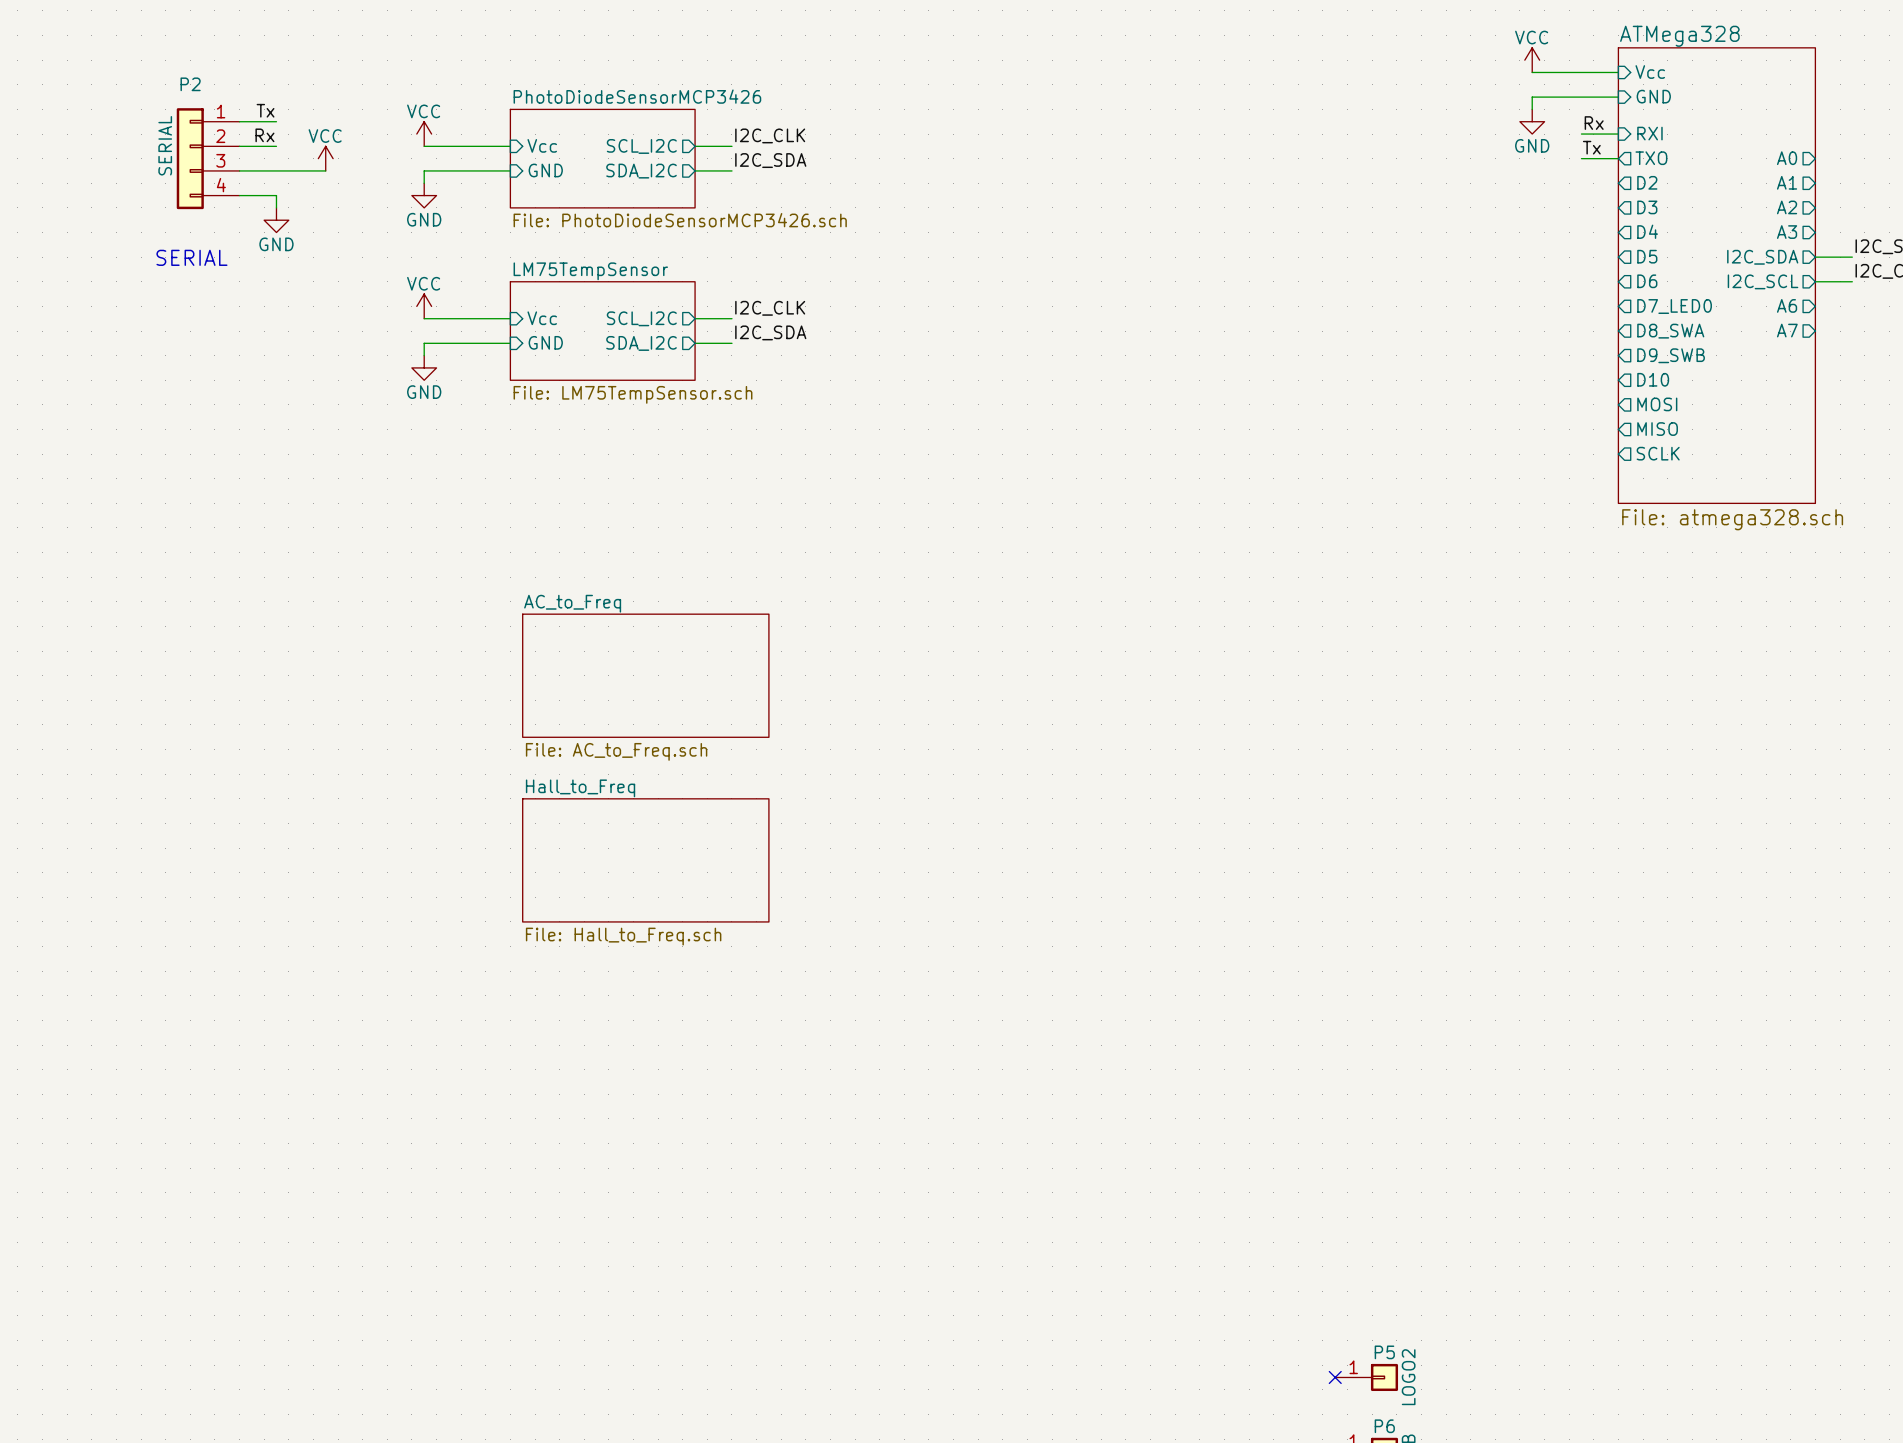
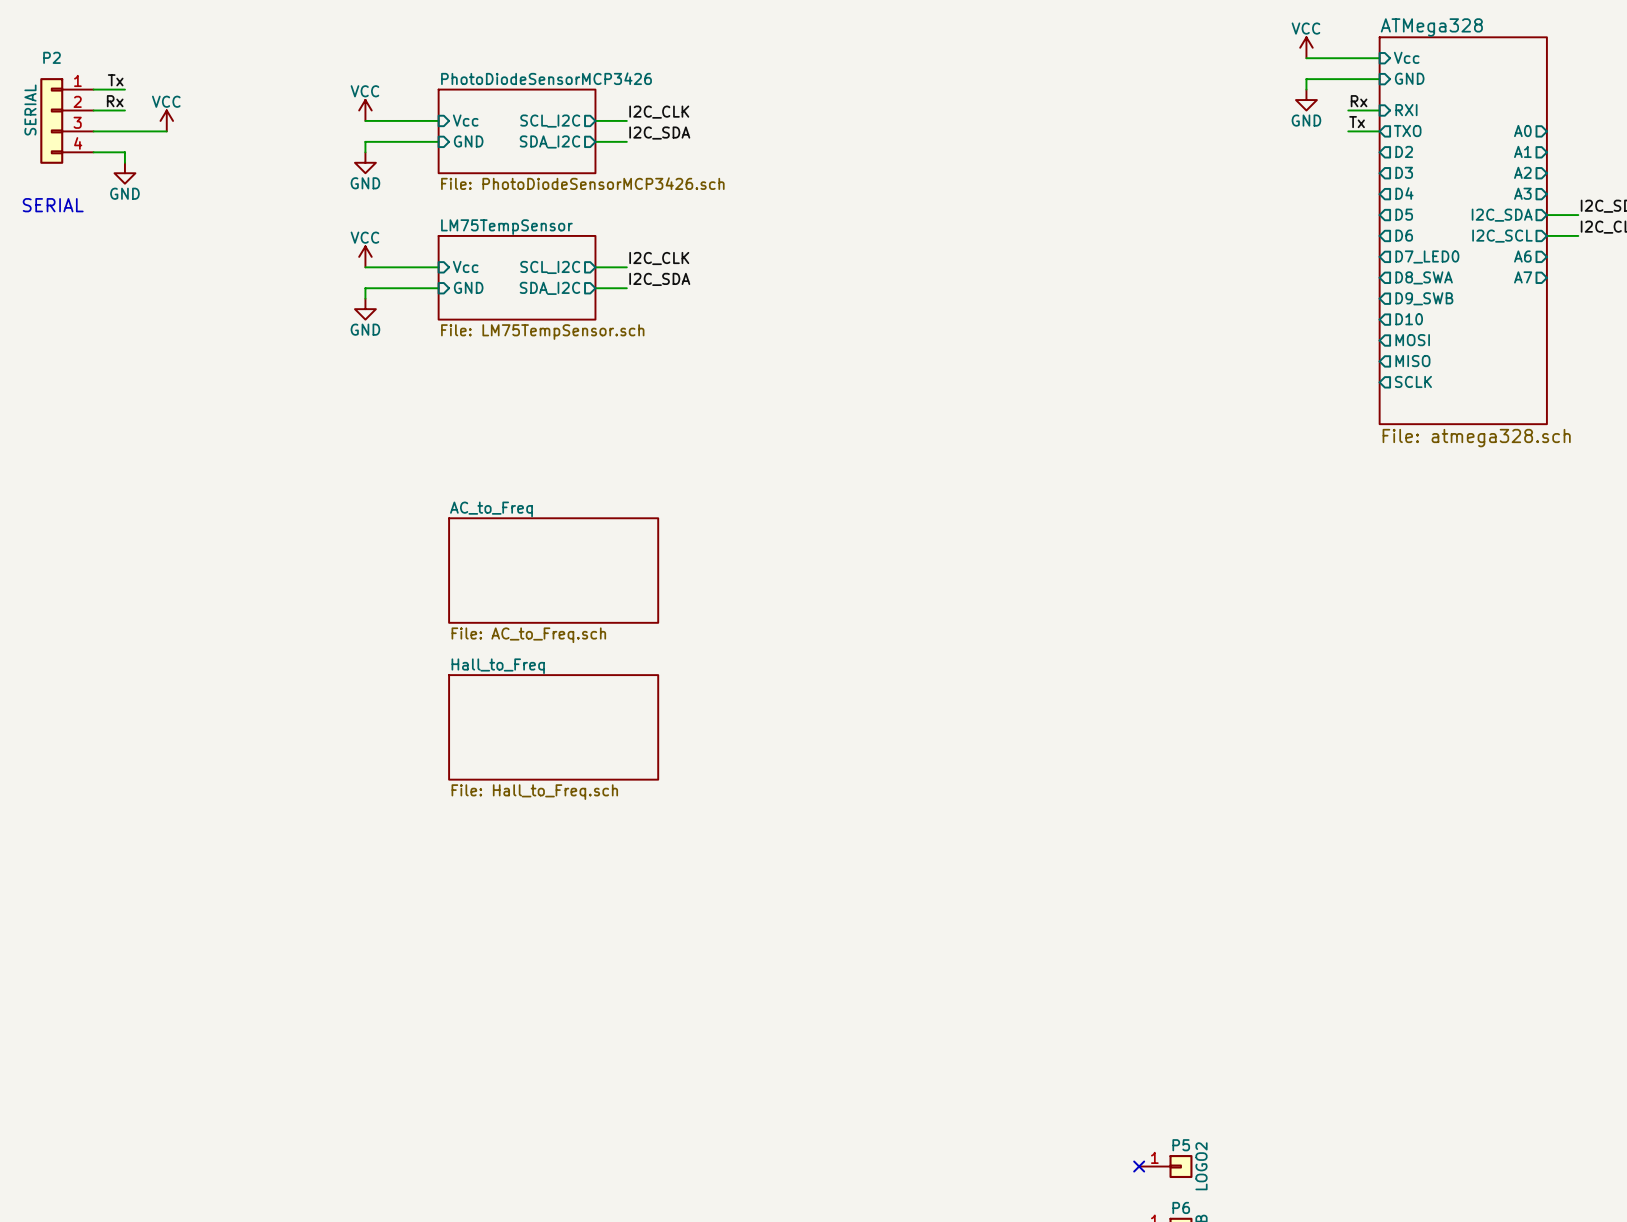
label position: Tx (265, 110) -> Tx (115, 80)
wire: (239, 121) (276, 121) -> (93, 89) (124, 89)
label position: Rx (264, 135) -> Rx (115, 101)
wire: (239, 146) (276, 146) -> (93, 110) (124, 110)
P2 position: (208, 158) -> (66, 120)
power symbol position: VCC (325, 158) -> VCC (166, 120)
wire: (239, 170) (325, 170) -> (93, 131) (166, 131)
wire: (239, 195) (276, 195) (276, 207) -> (93, 152) (124, 152) (124, 162)
power symbol position: GND (276, 220) -> GND (124, 173)
text position: SERIAL (191, 257) -> SERIAL (53, 205)

